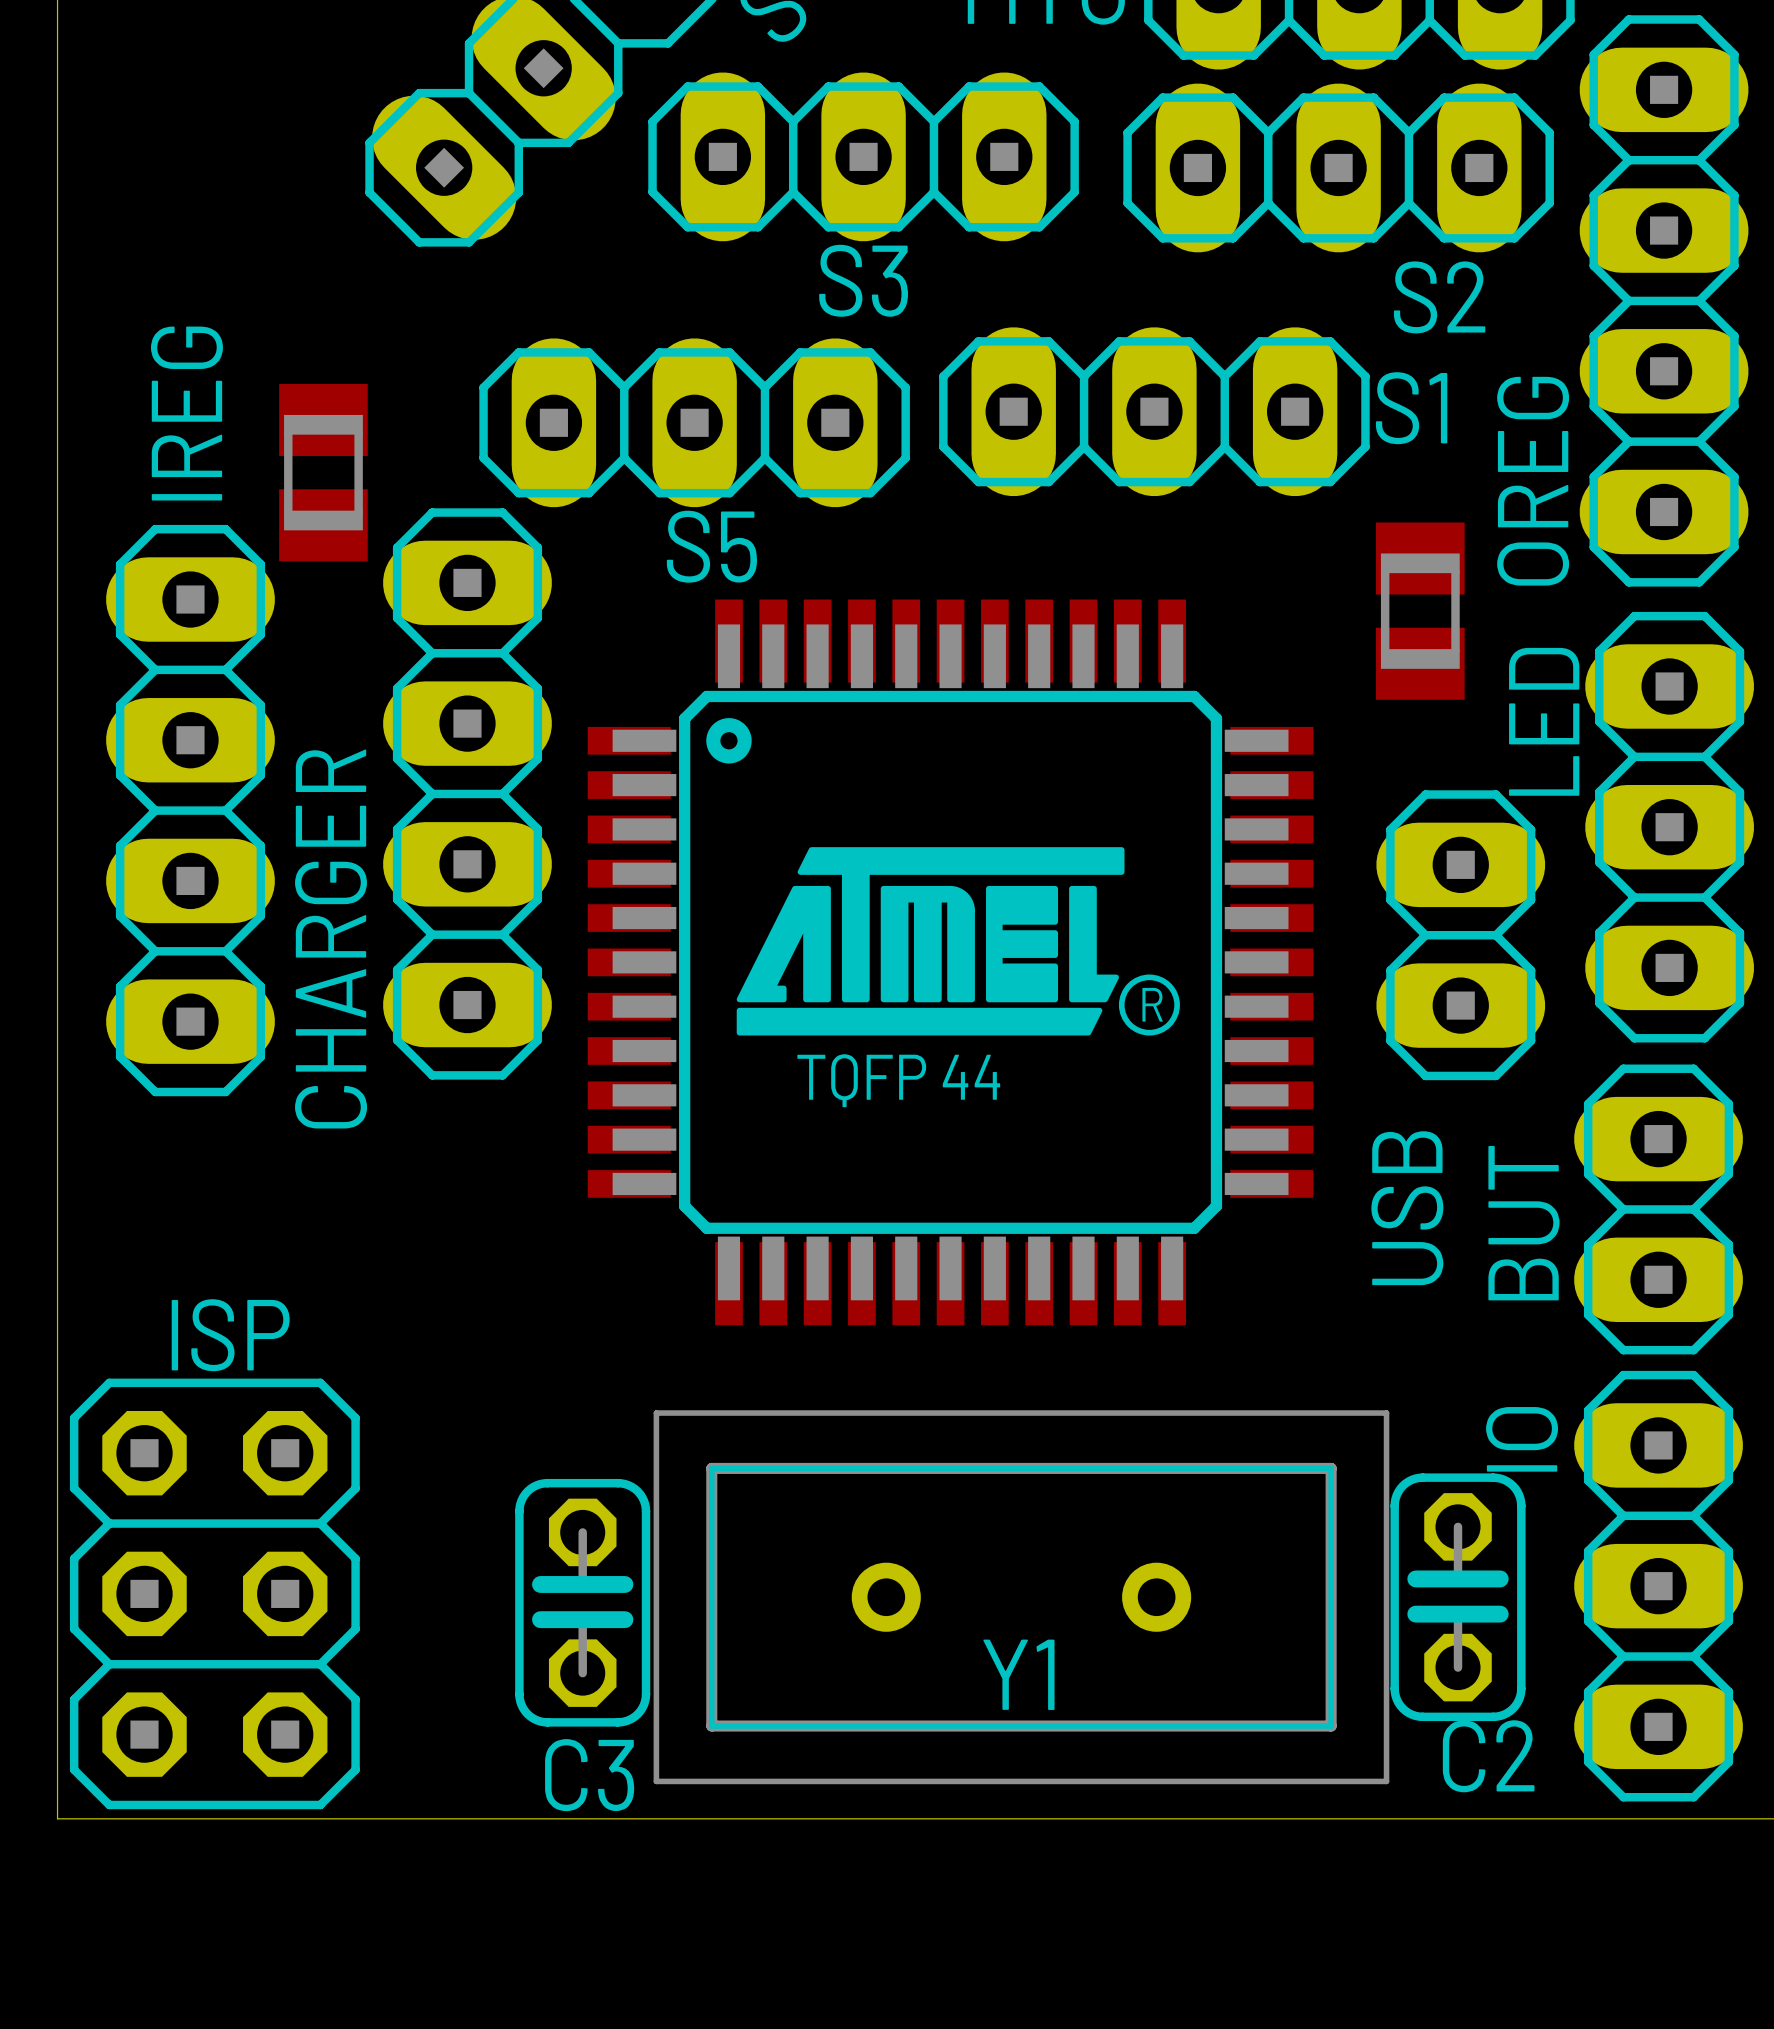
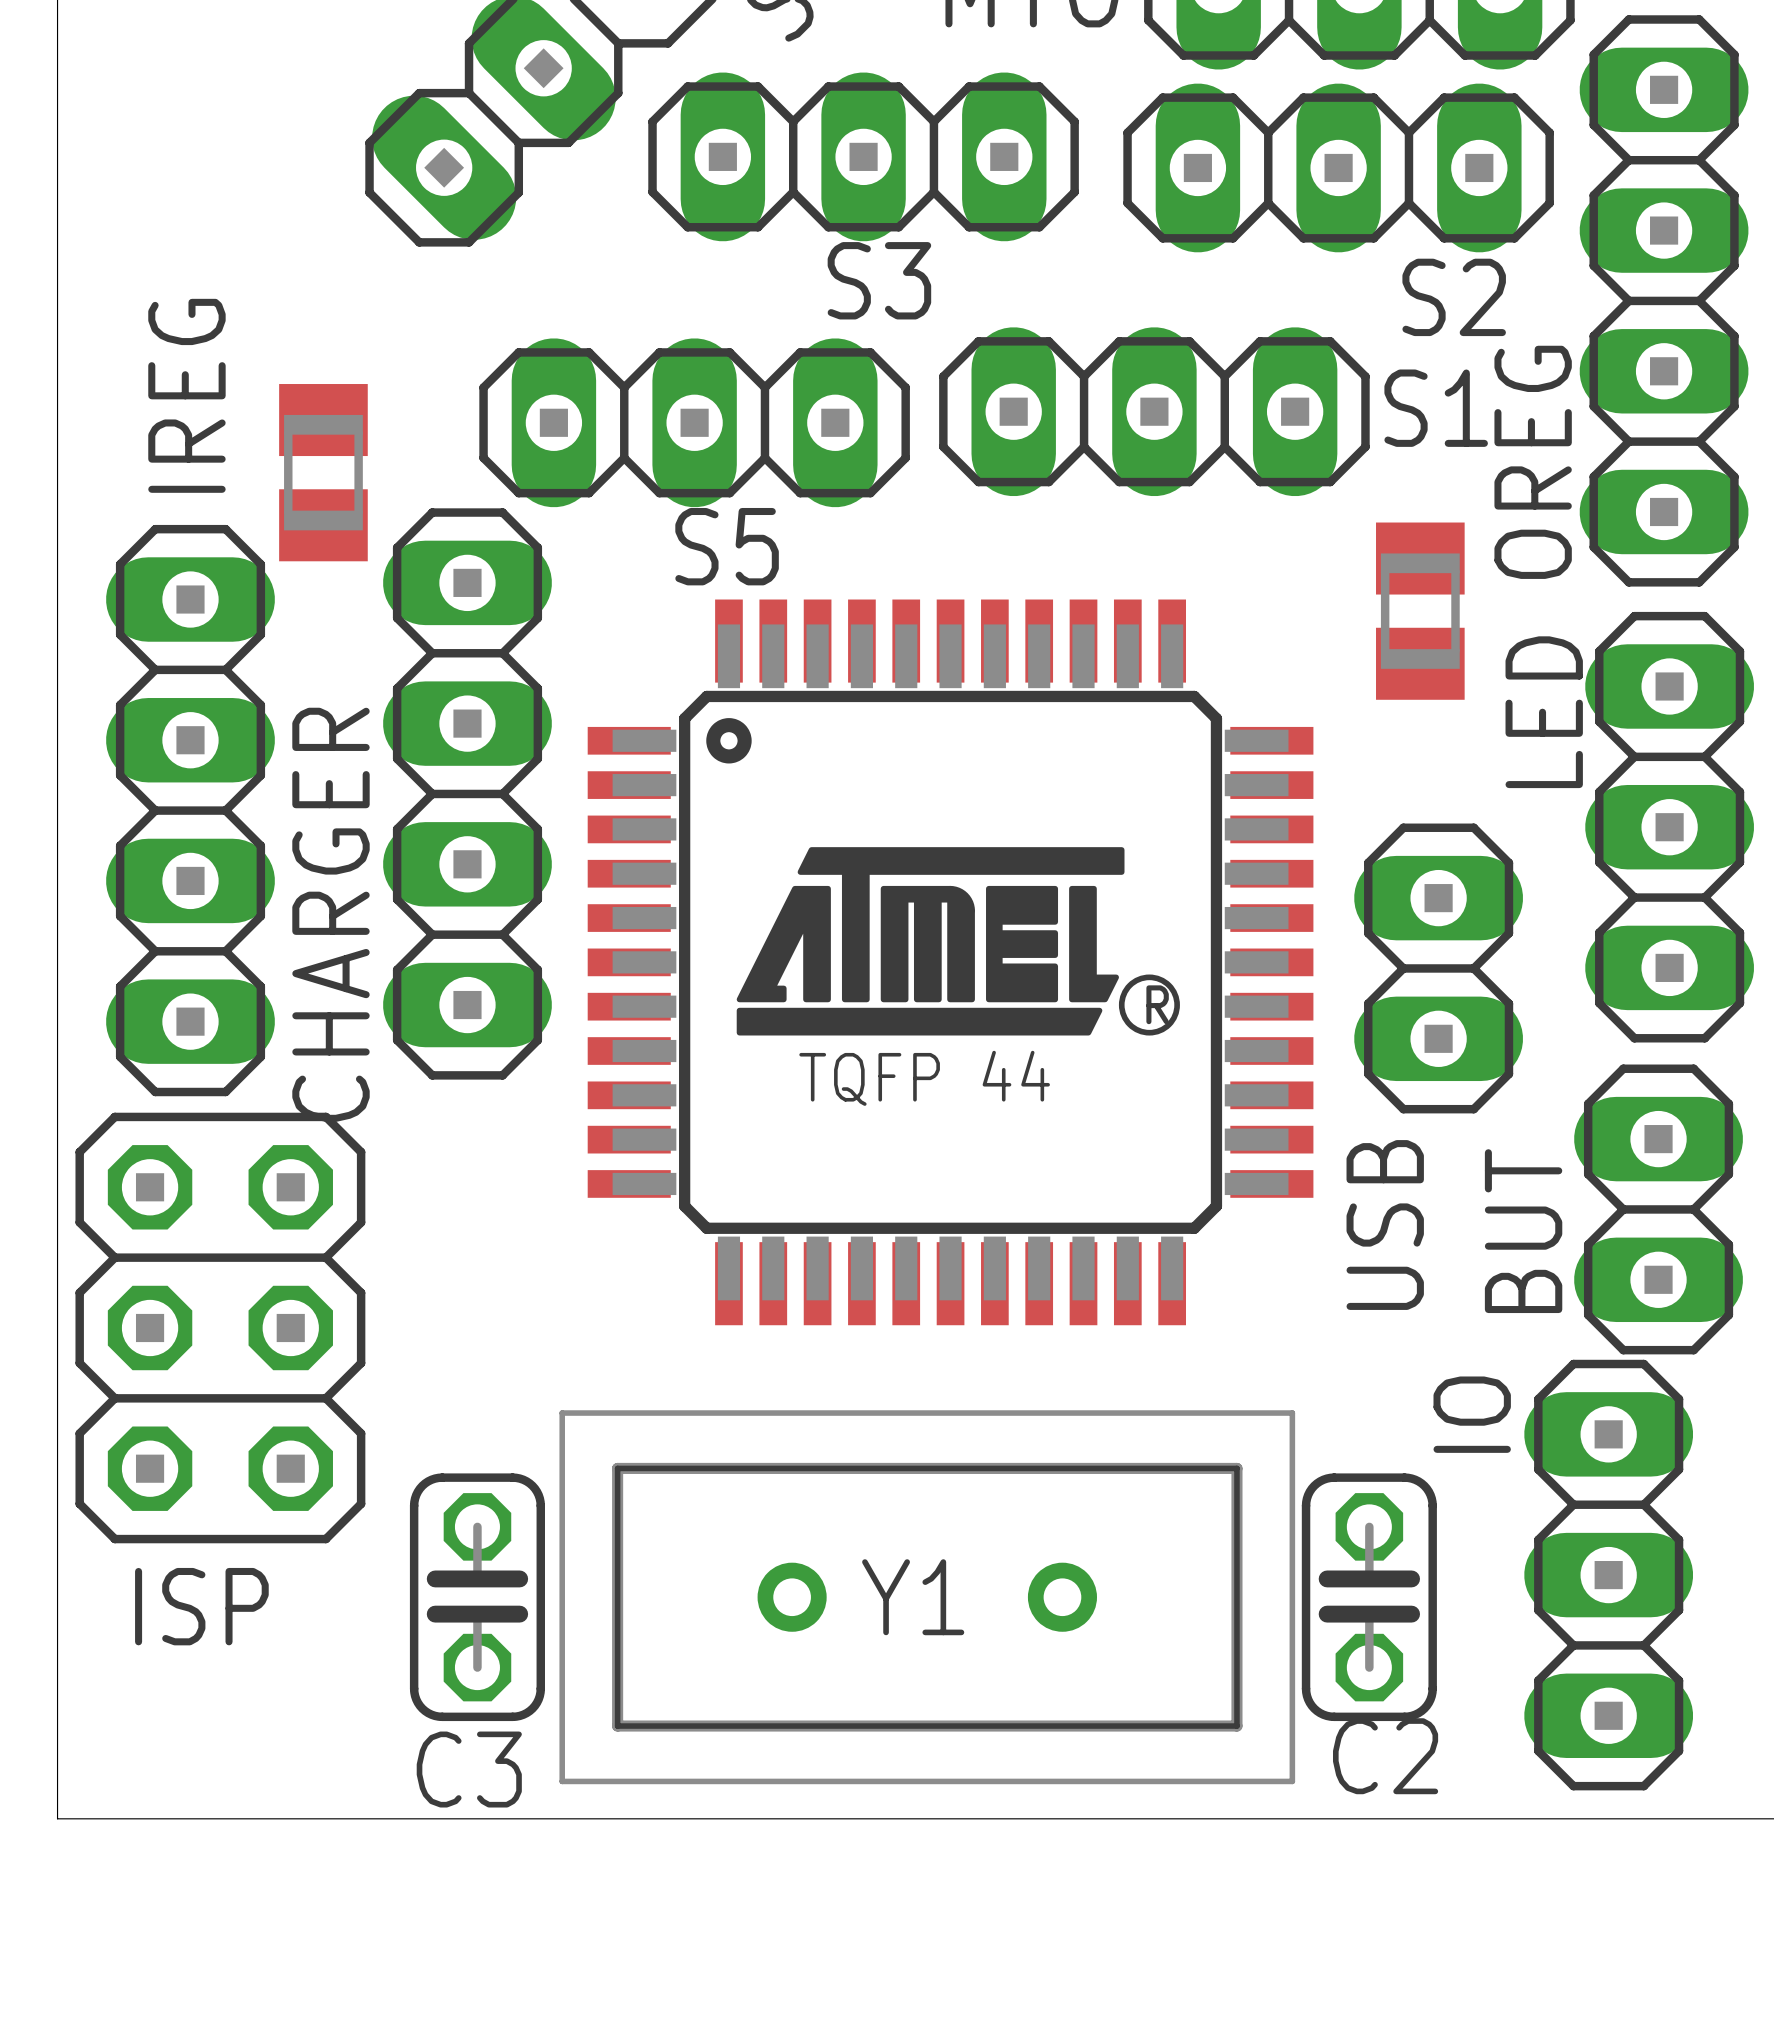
USB position: (1460, 935) -> (1438, 968)
ISP name position: ISP (230, 1335) -> ISP (201, 1606)
IO position: (1658, 1586) -> (1608, 1575)
ISP position: (214, 1593) -> (220, 1328)
Y1 position: (1021, 1597) -> (927, 1597)
C2 position: (1458, 1597) -> (1369, 1597)
C3 position: (582, 1602) -> (477, 1597)
Y1 name position: Y1 (1018, 1674) -> Y1 (913, 1597)

